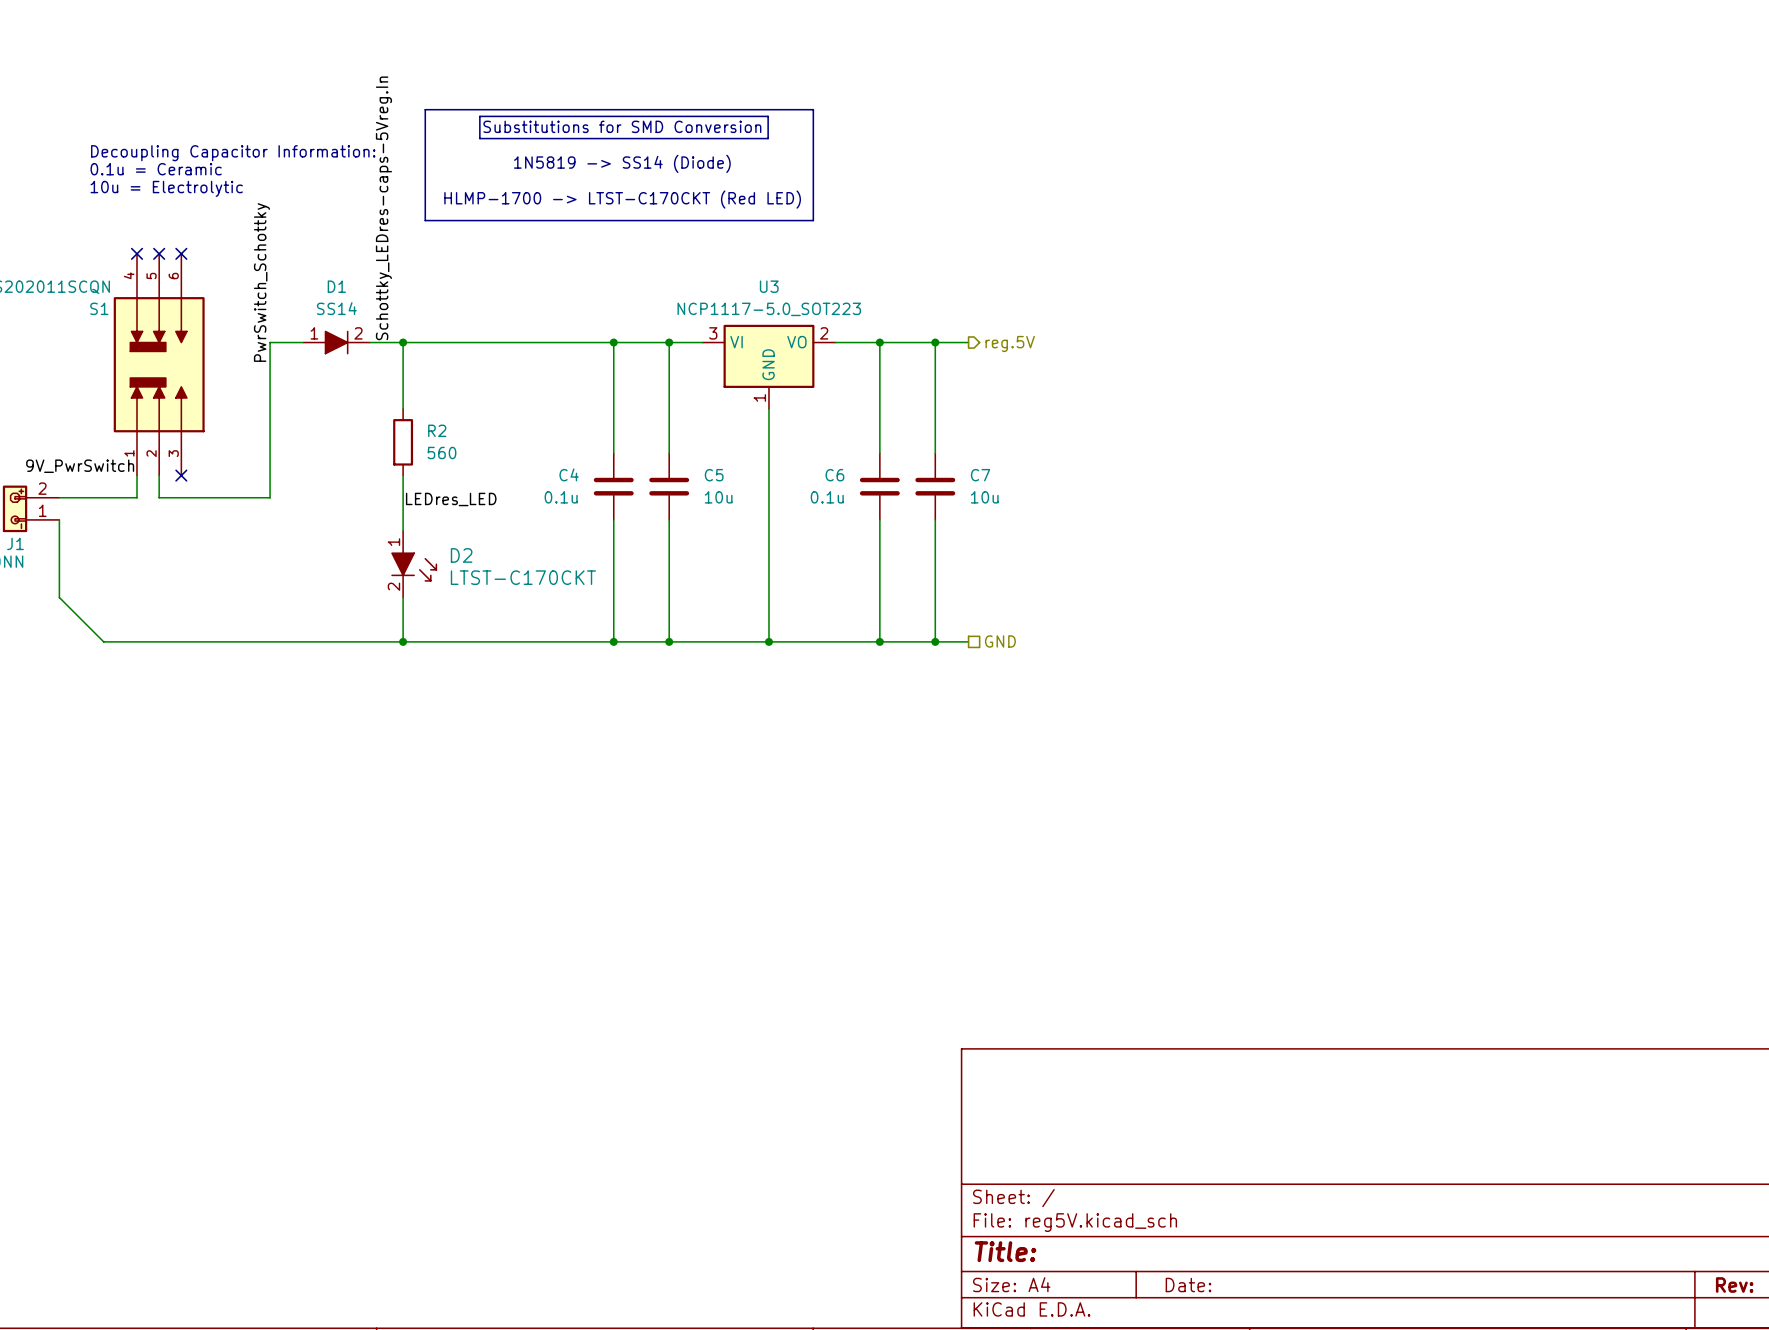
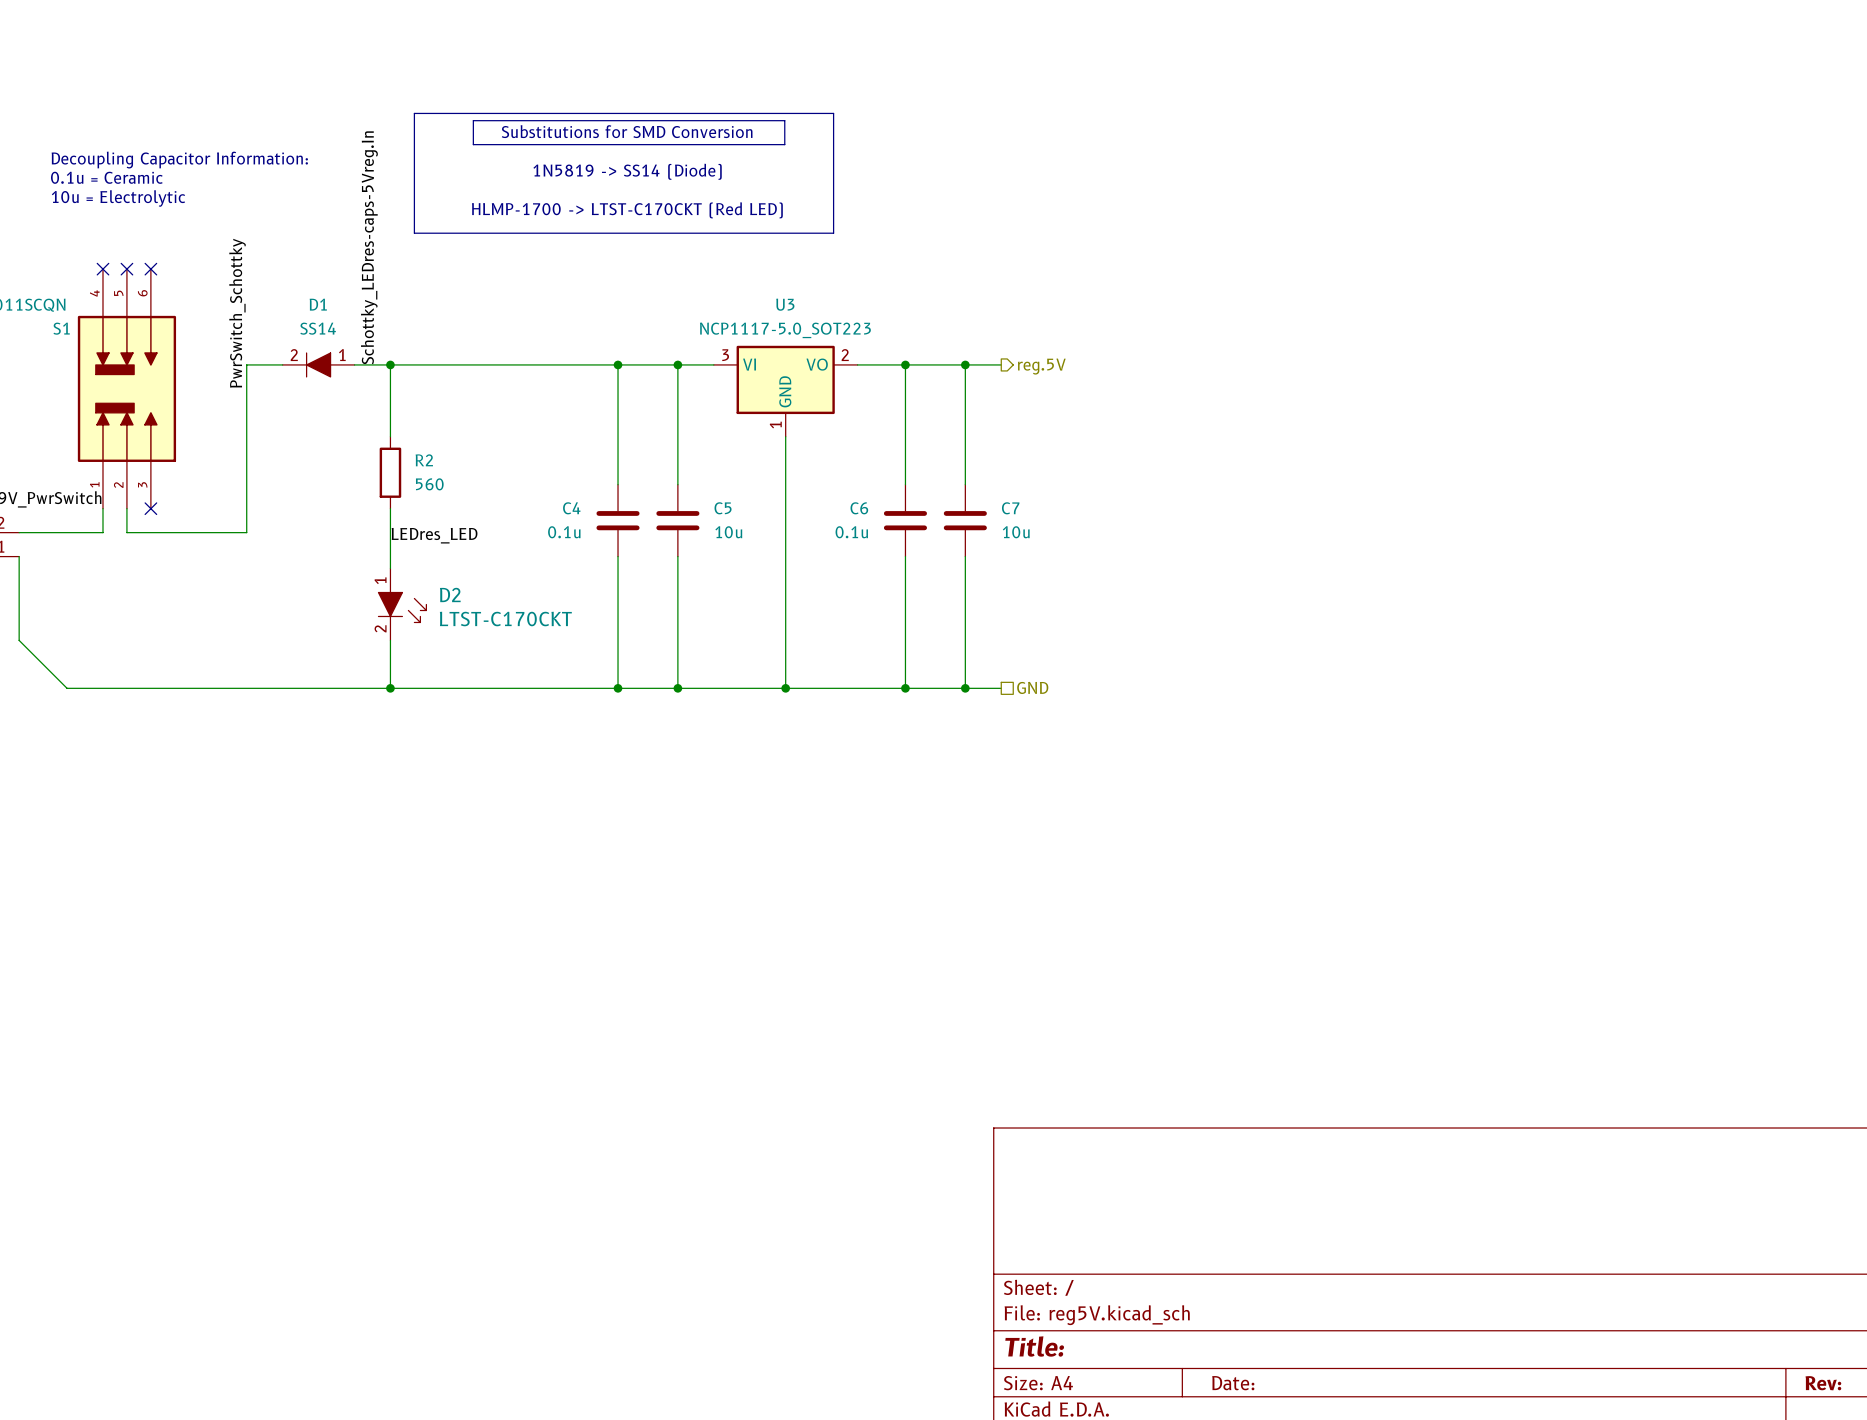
D1 rotation: 0° (336, 342) -> 180° (318, 364)

